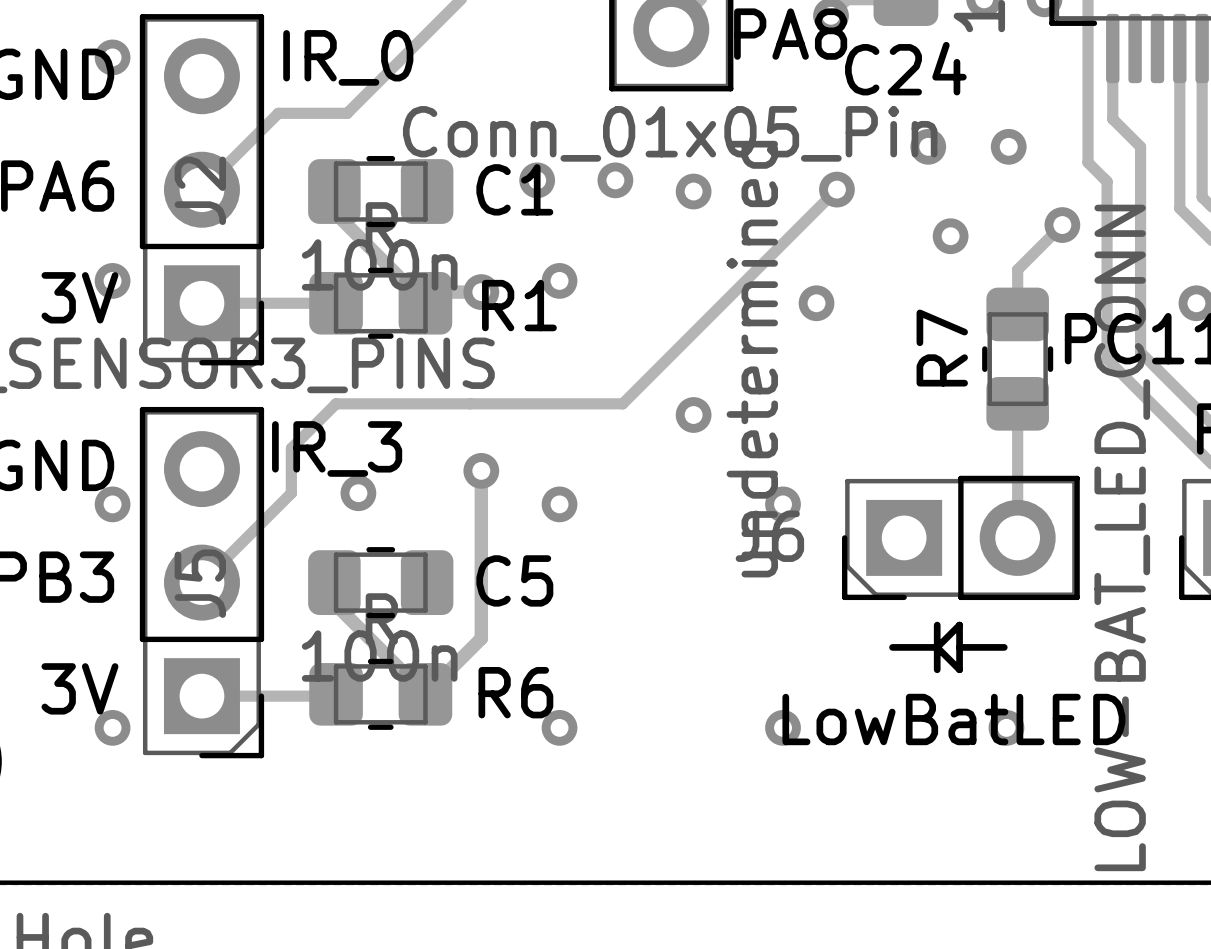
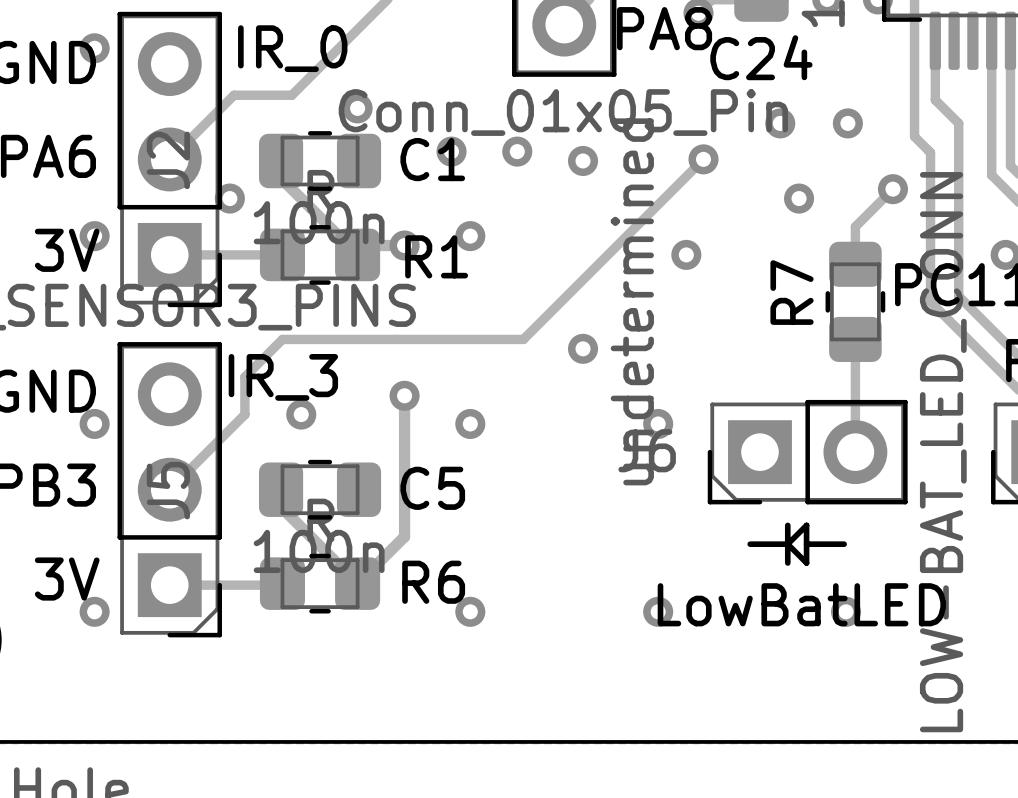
via: none -> (357, 108)
via: none -> (229, 198)

